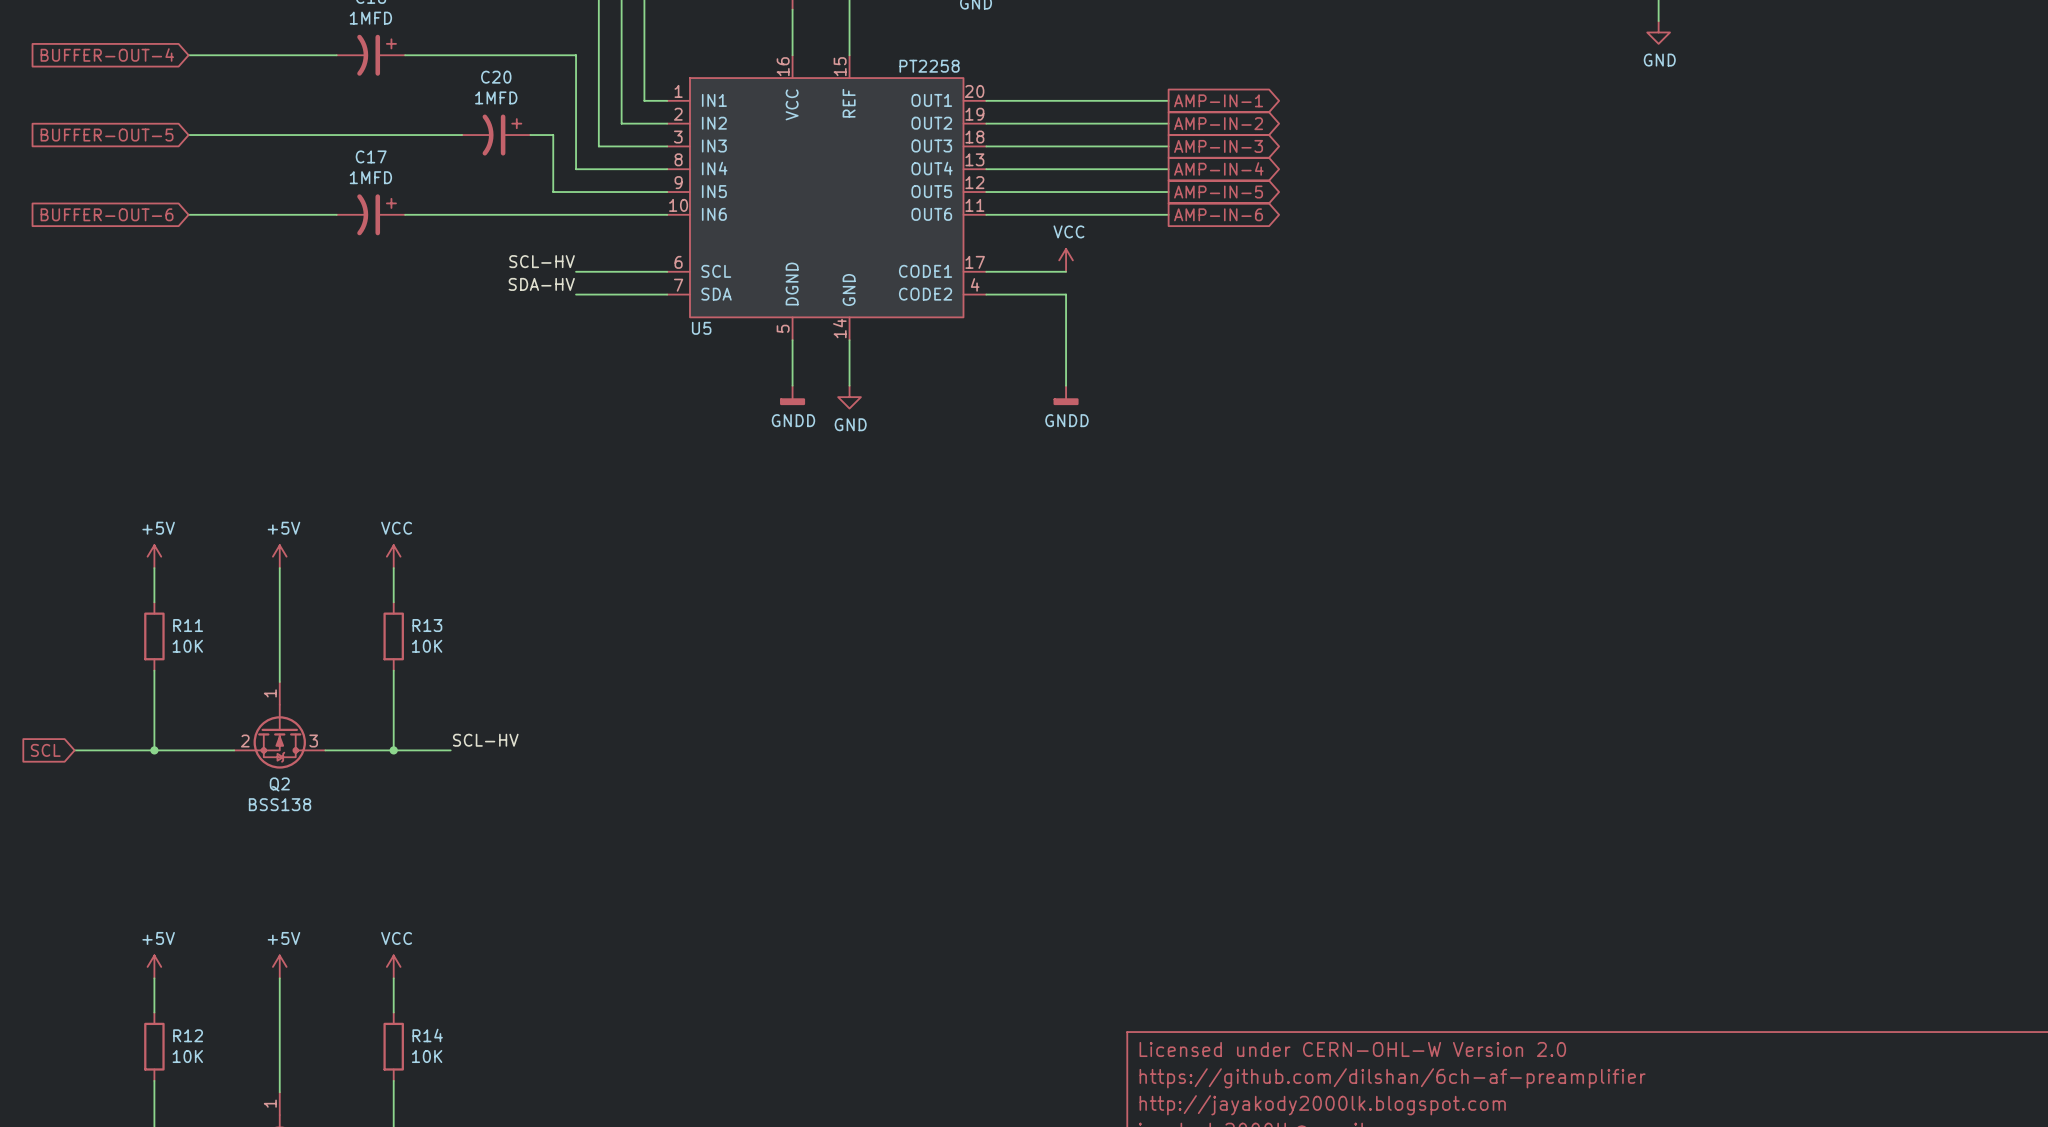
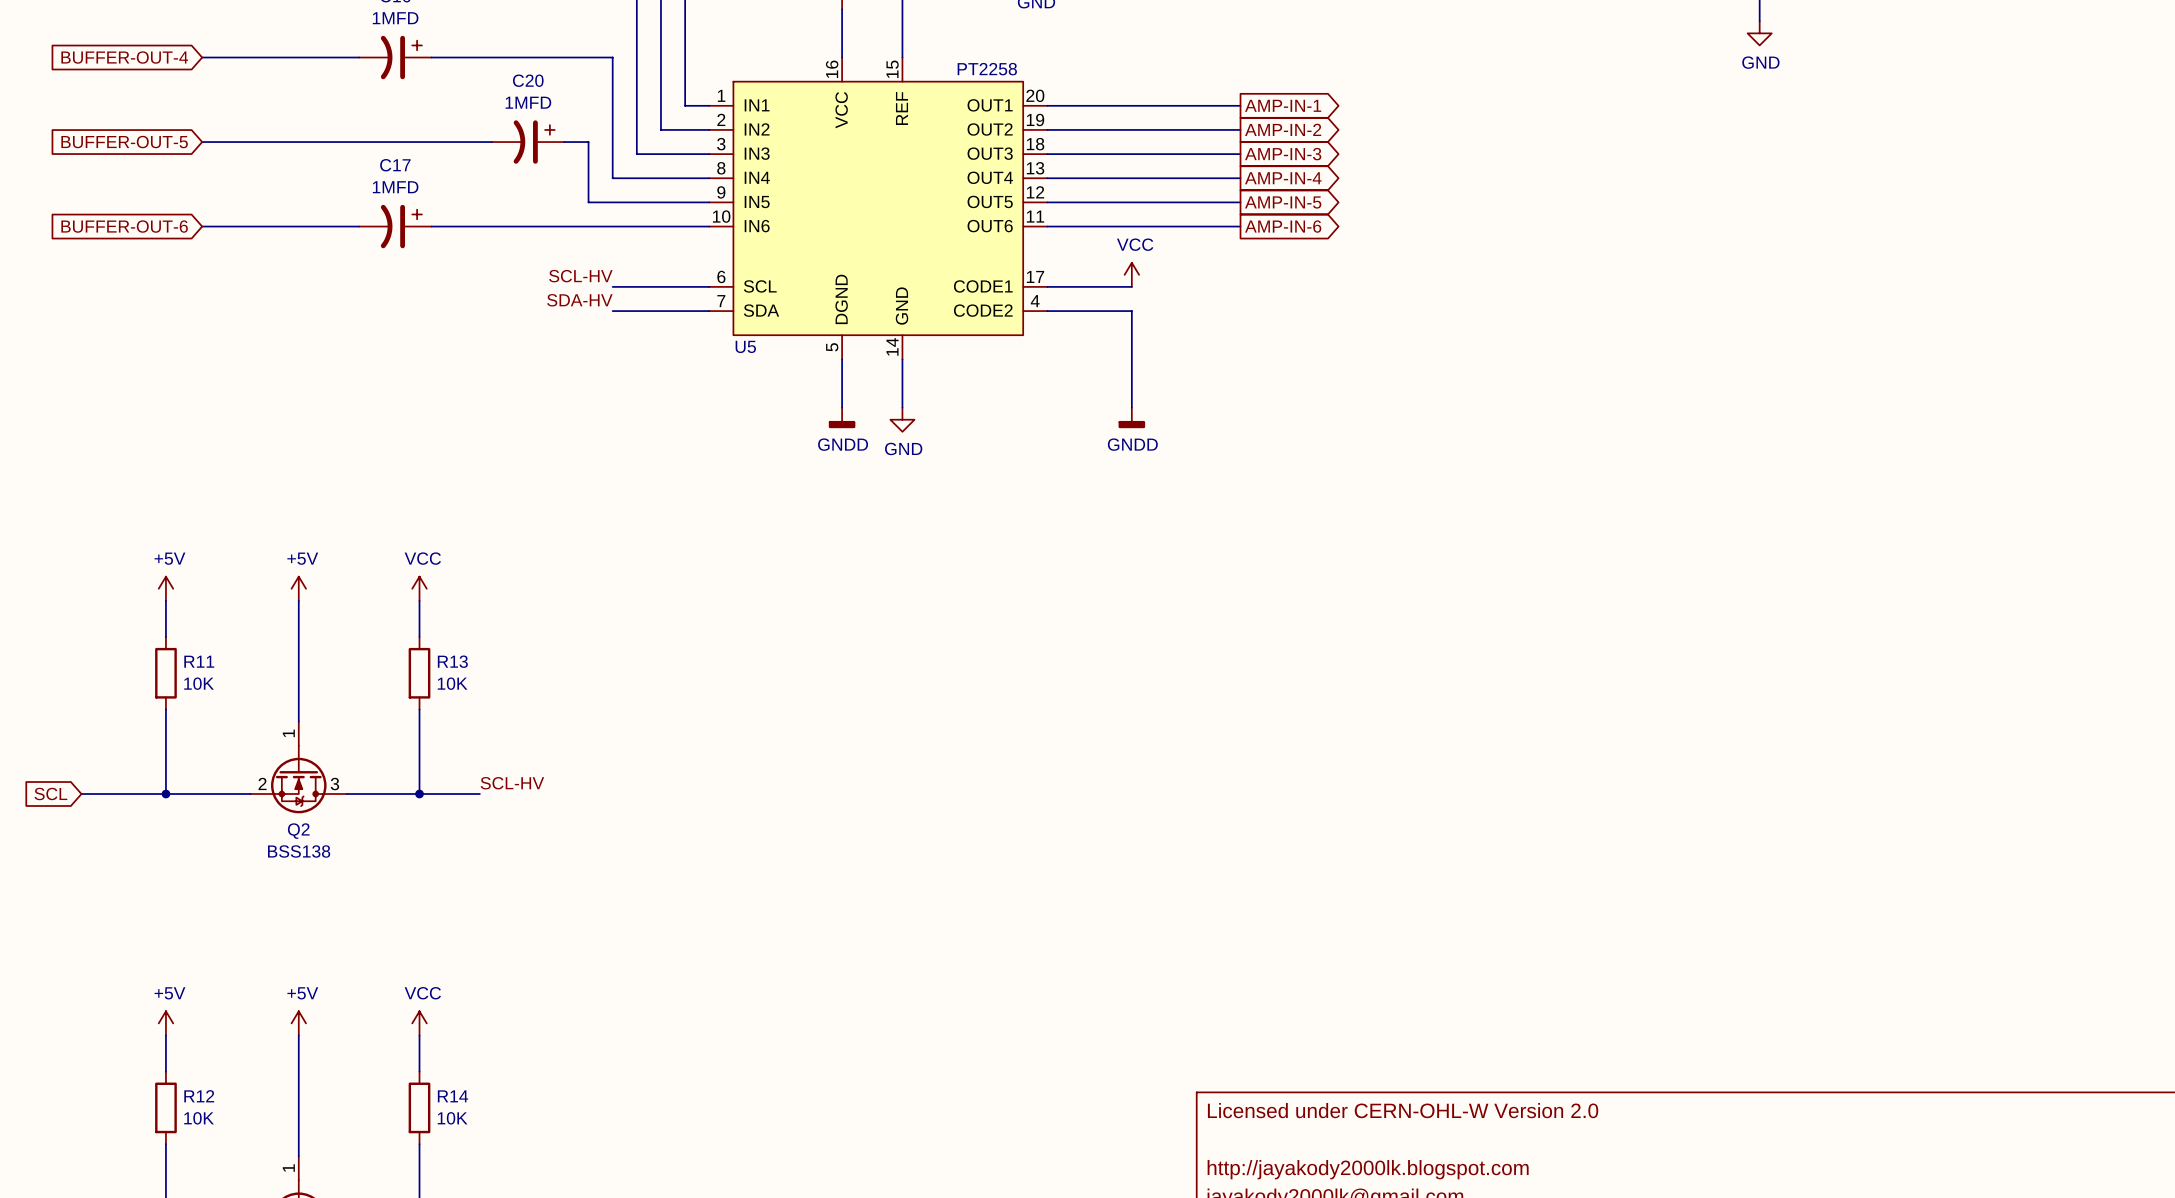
title block: https://github.com/dilshan/6ch-af-preamplifier (1392, 1078) -> none

